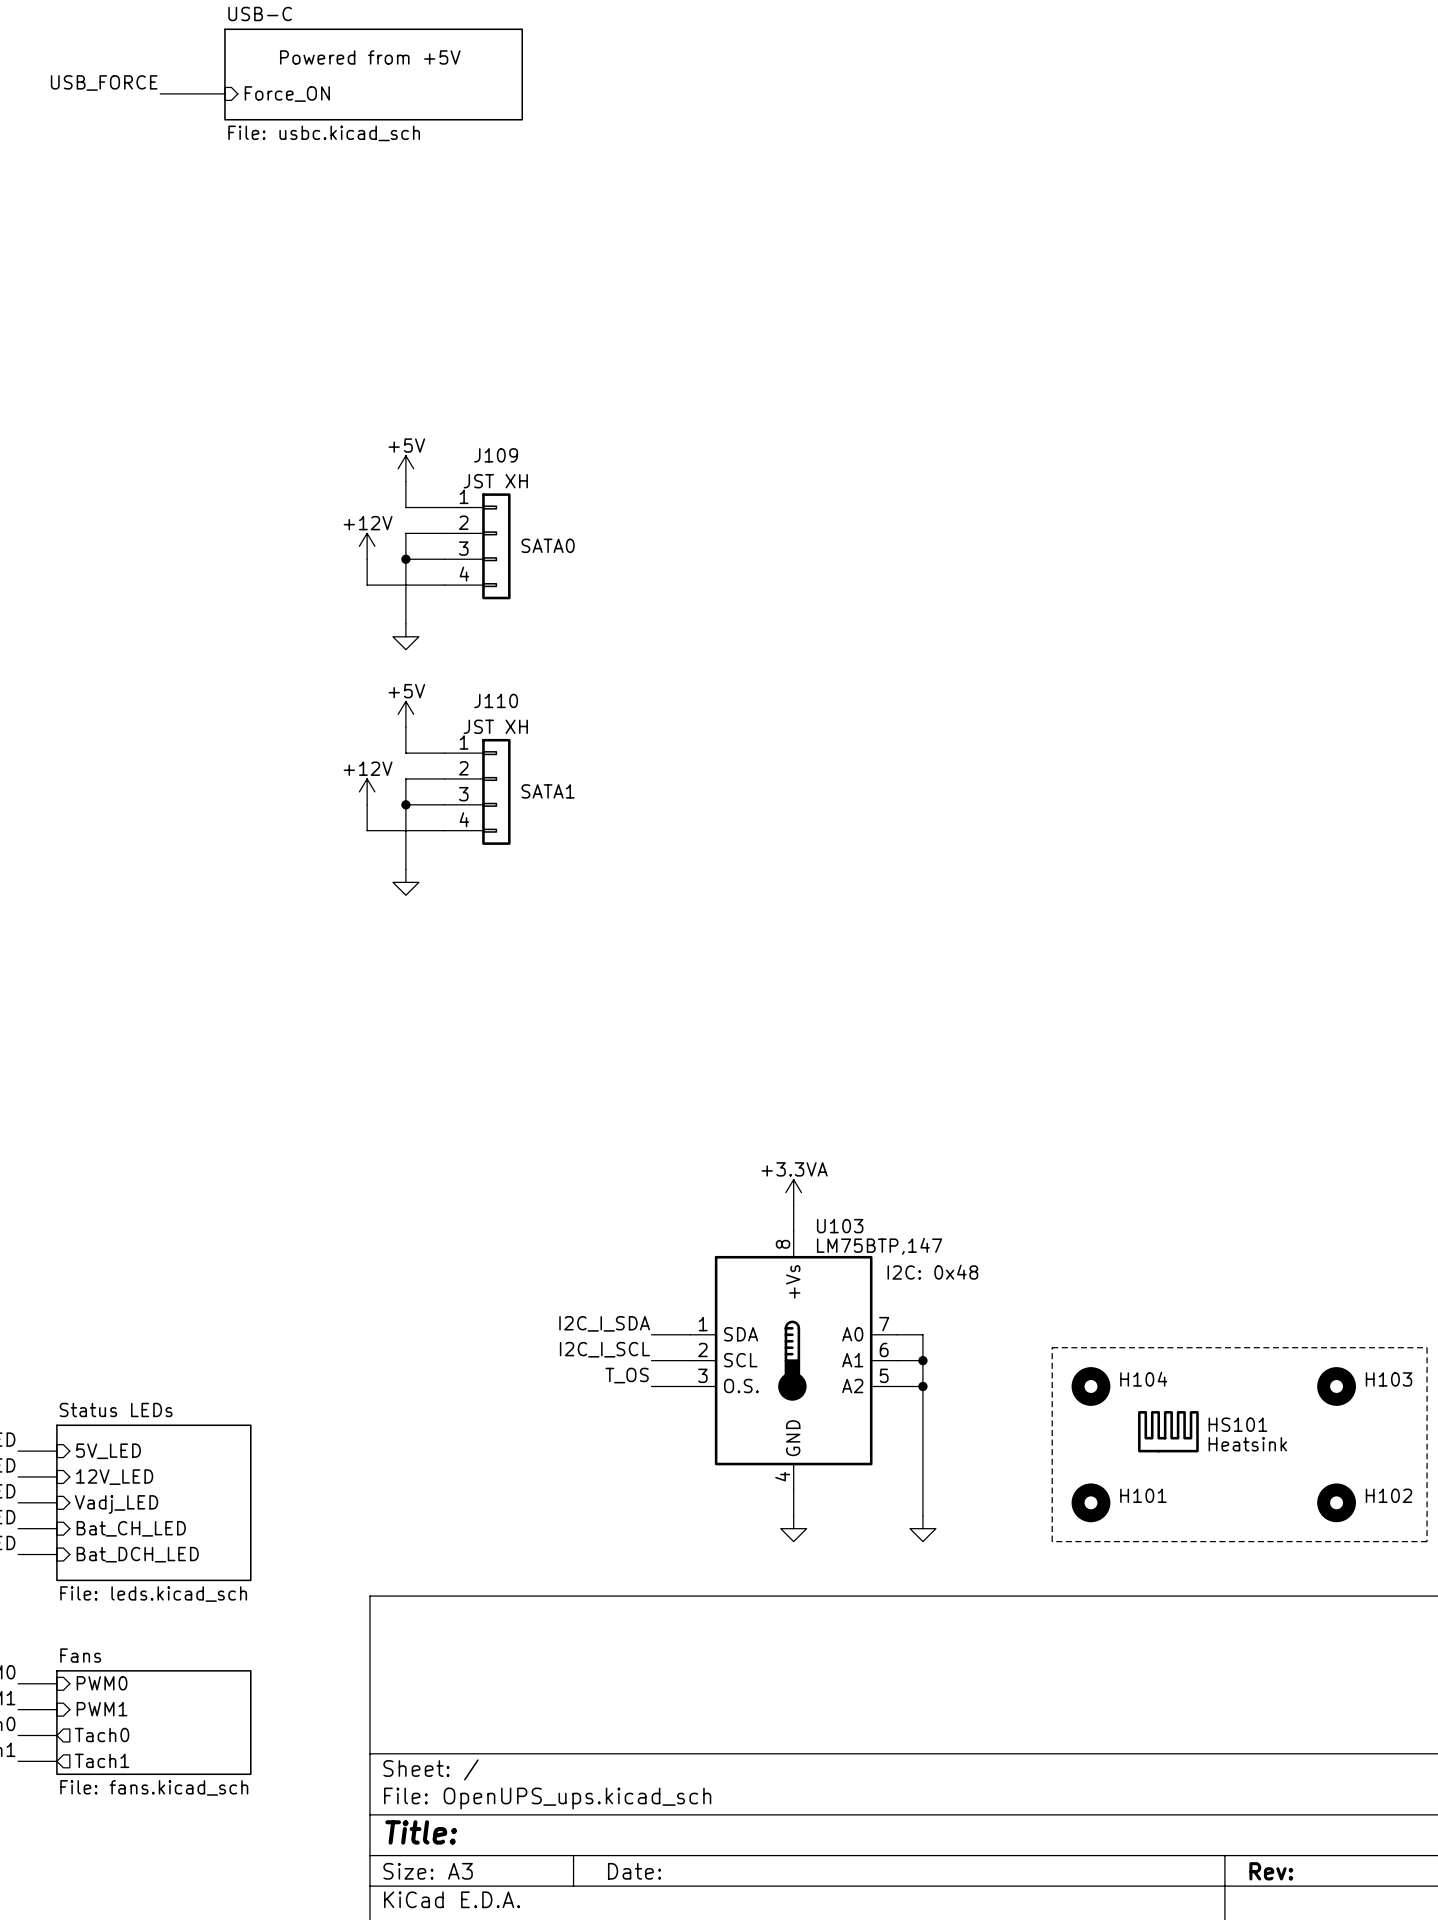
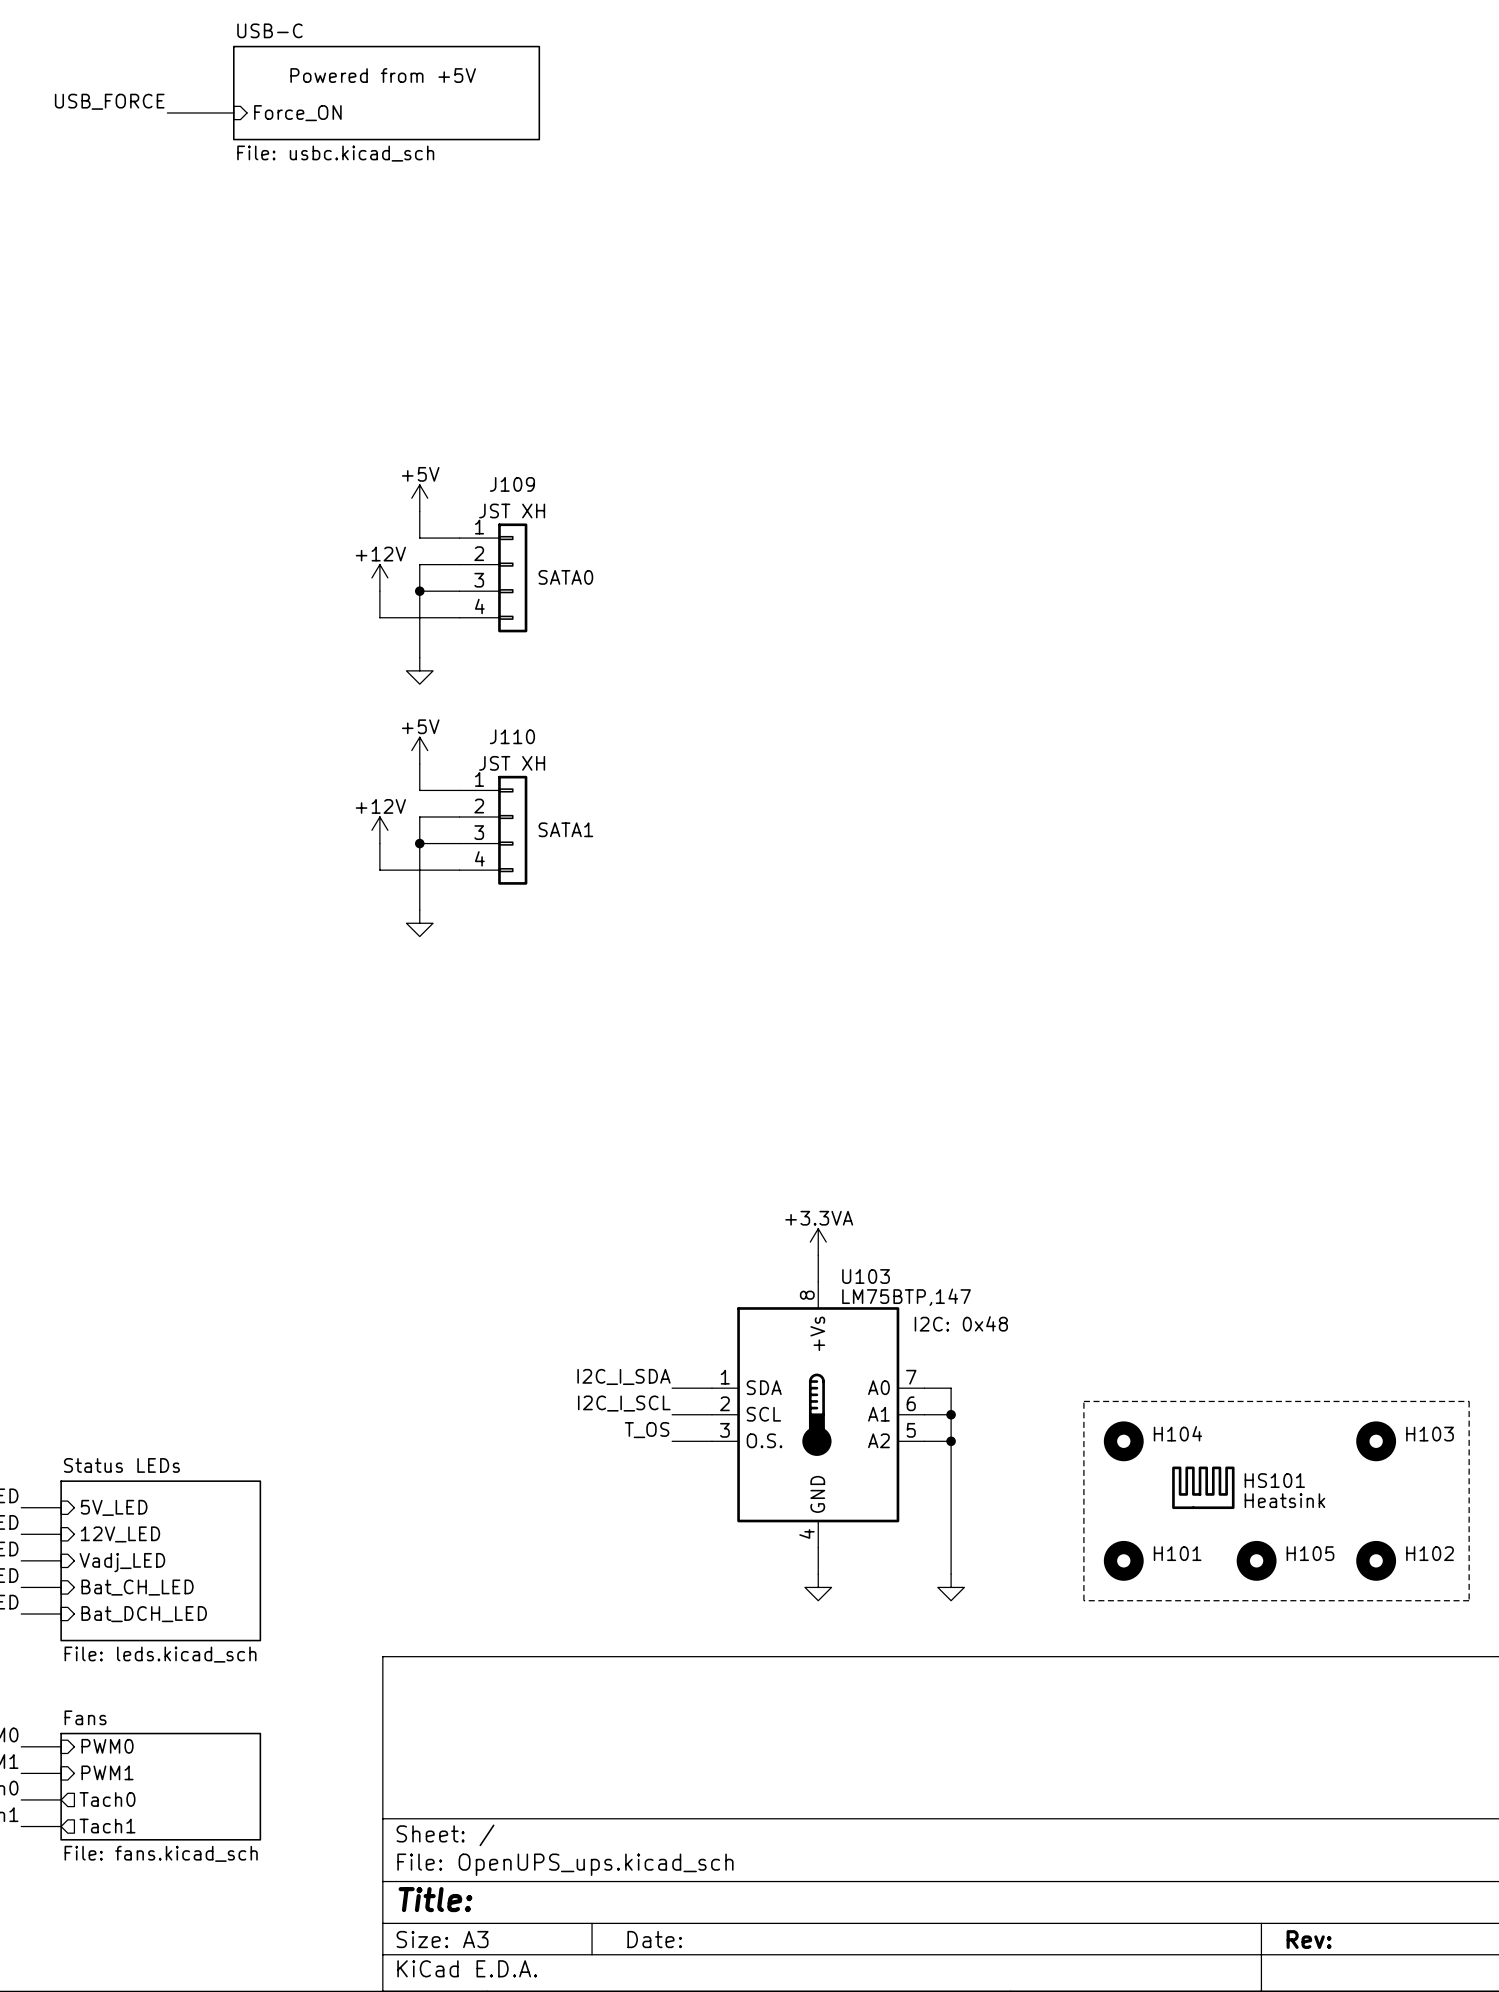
H105: none -> (1256, 1560)

